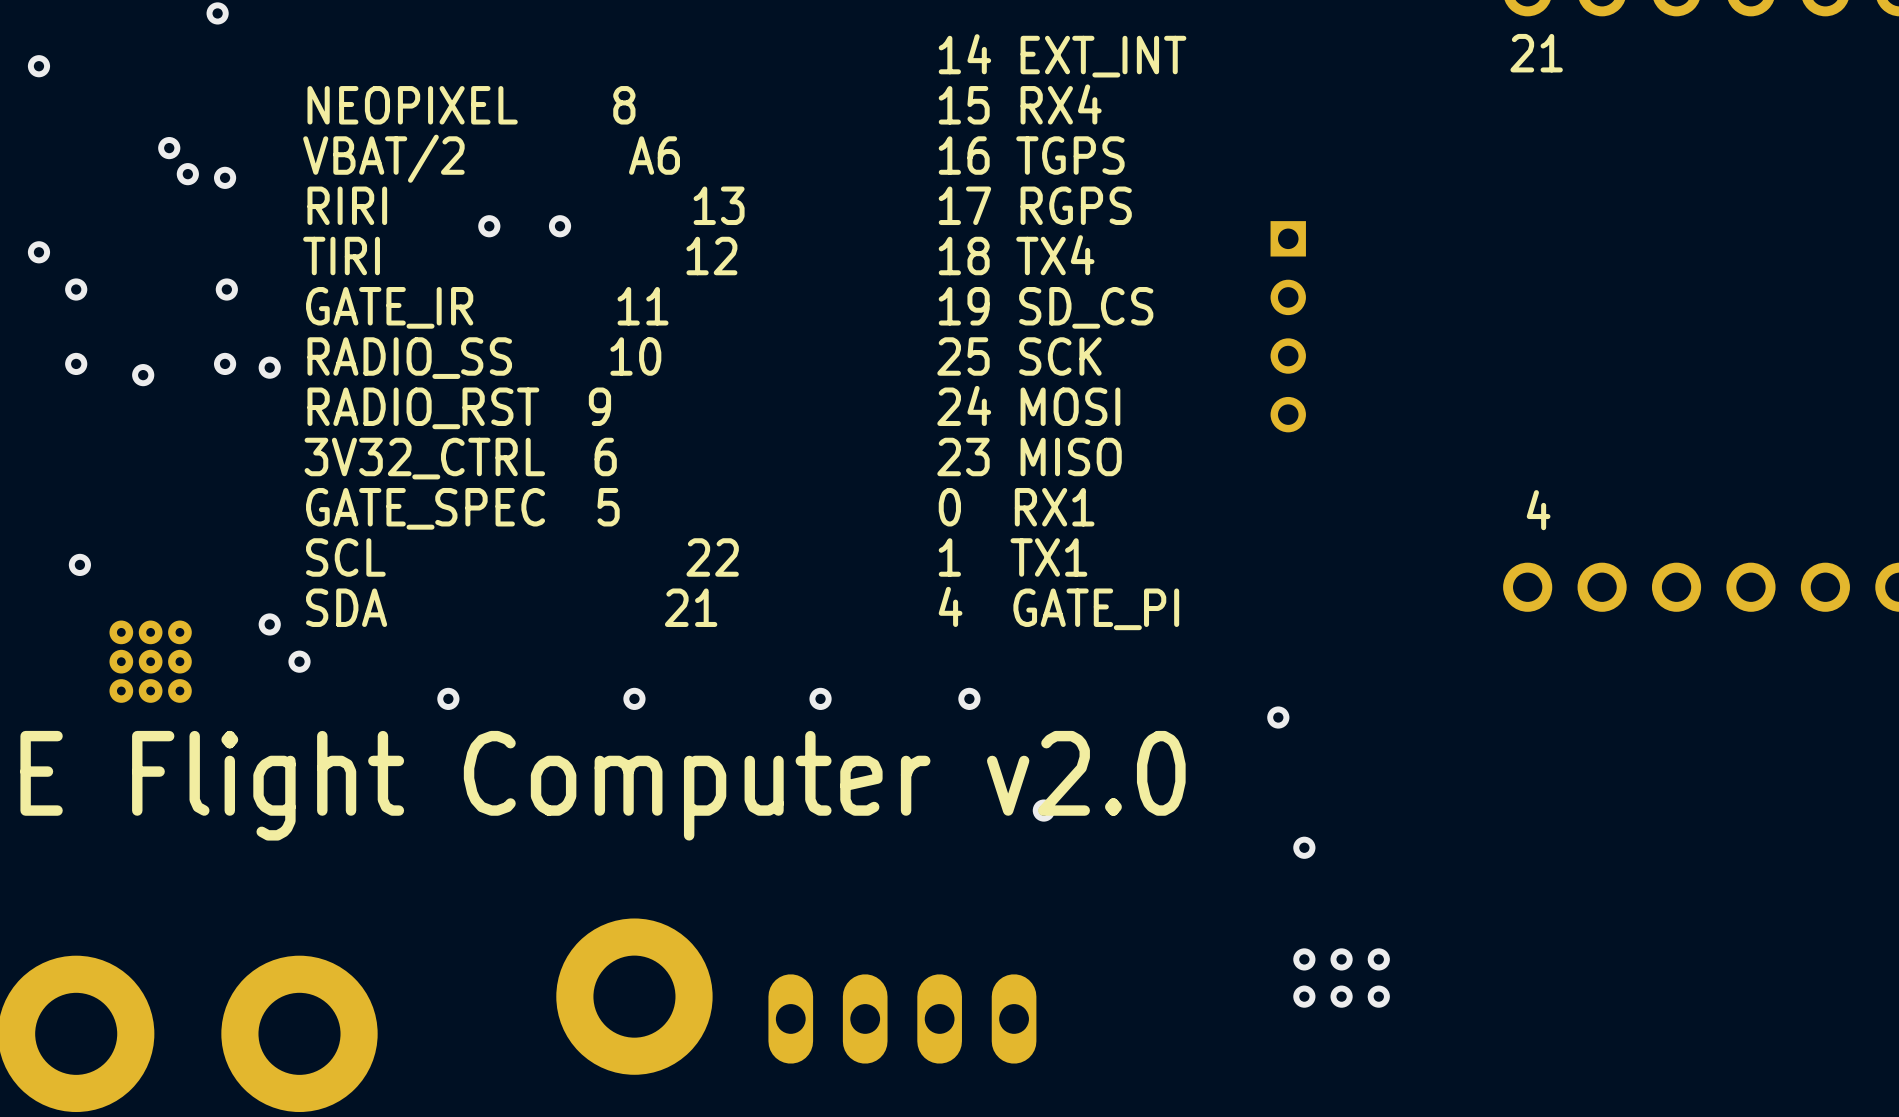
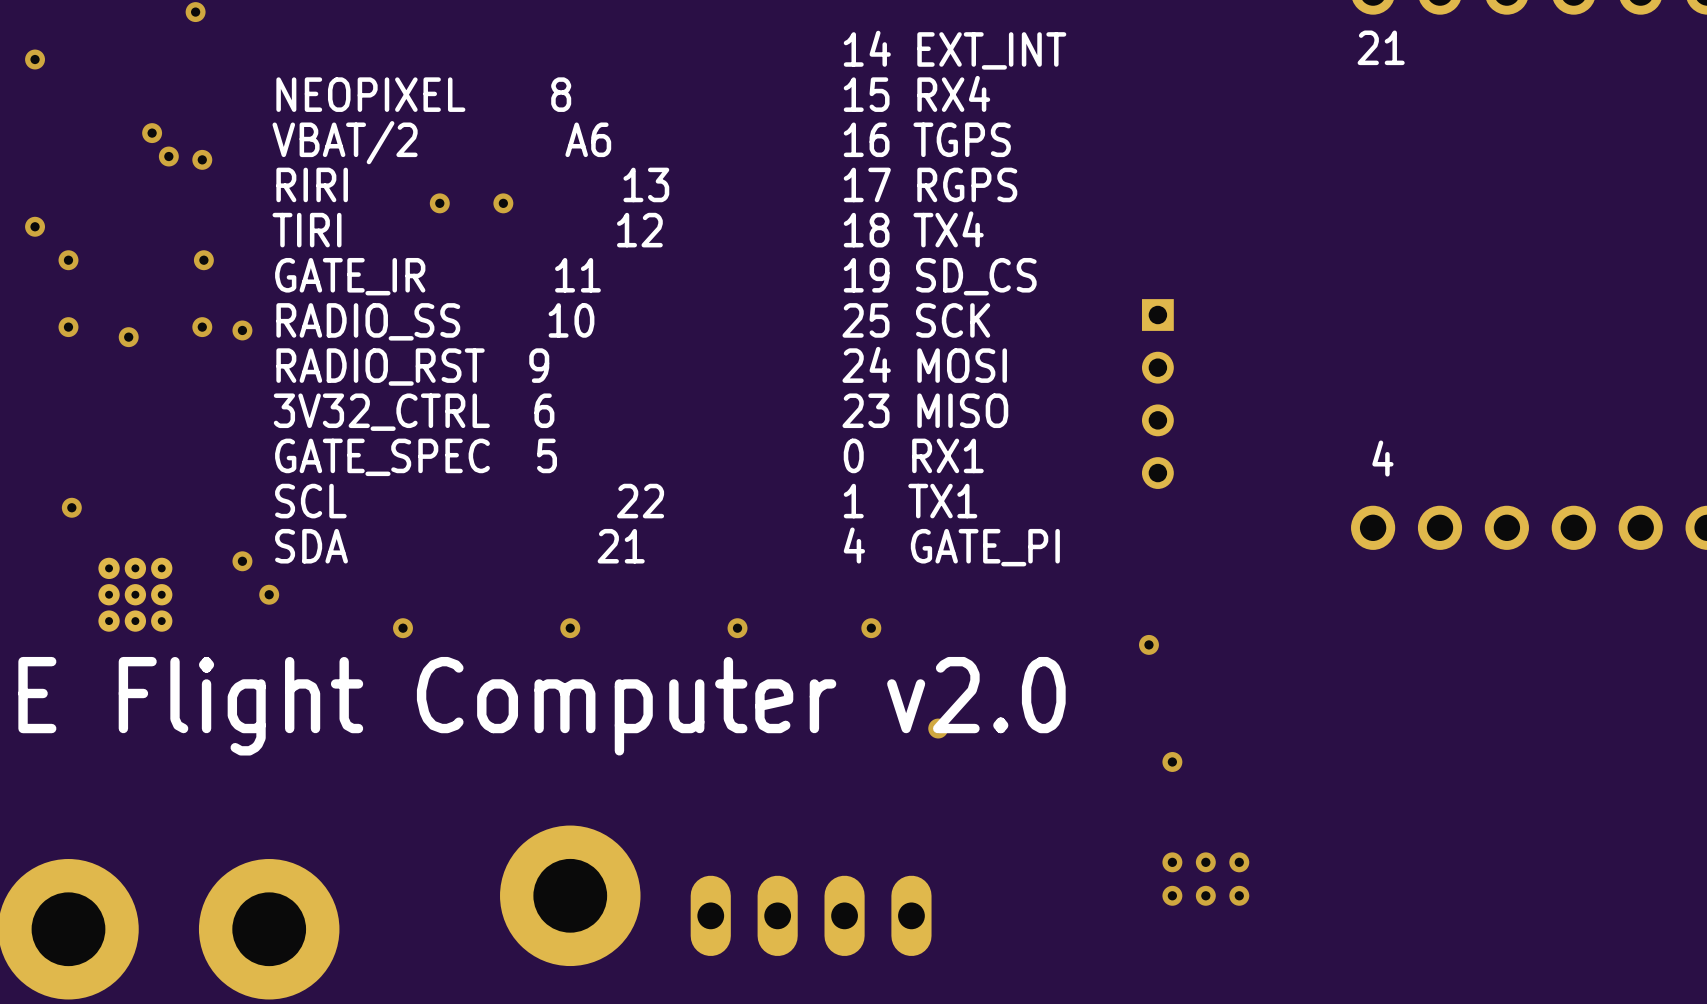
part position: (1288, 326) -> (1157, 394)

